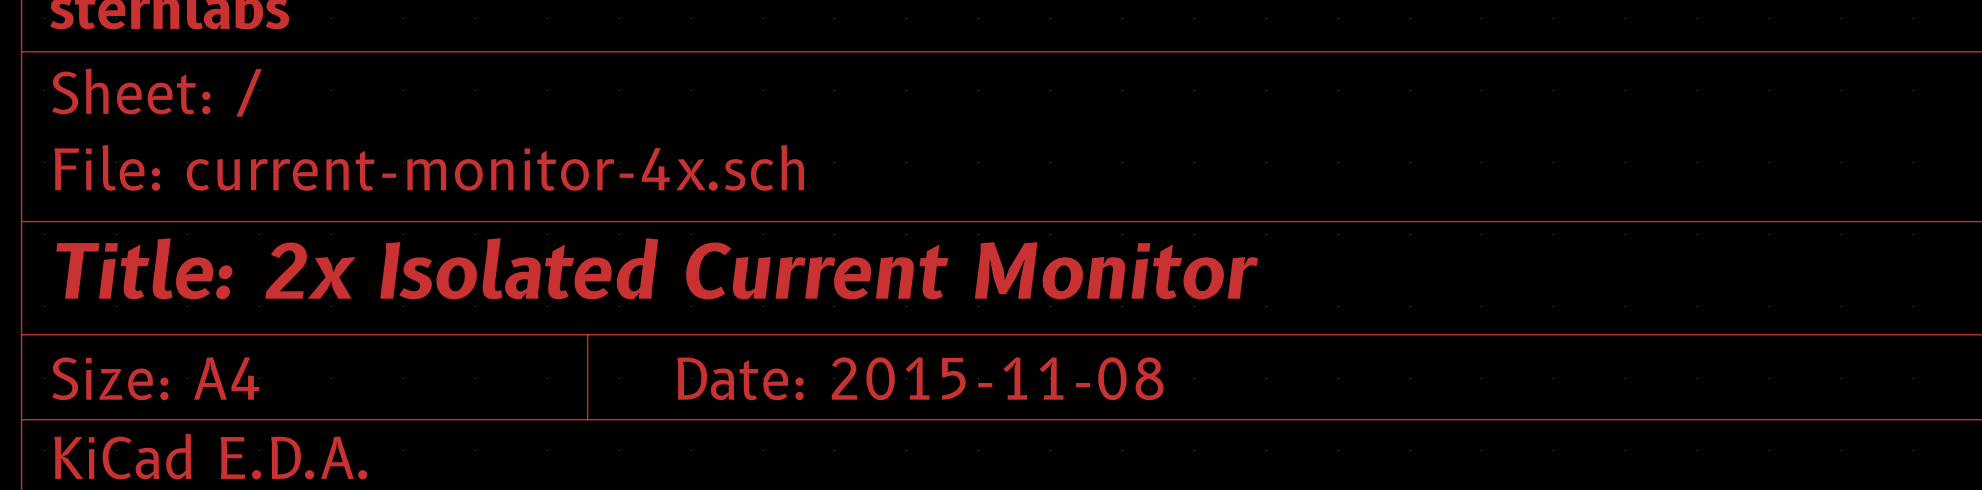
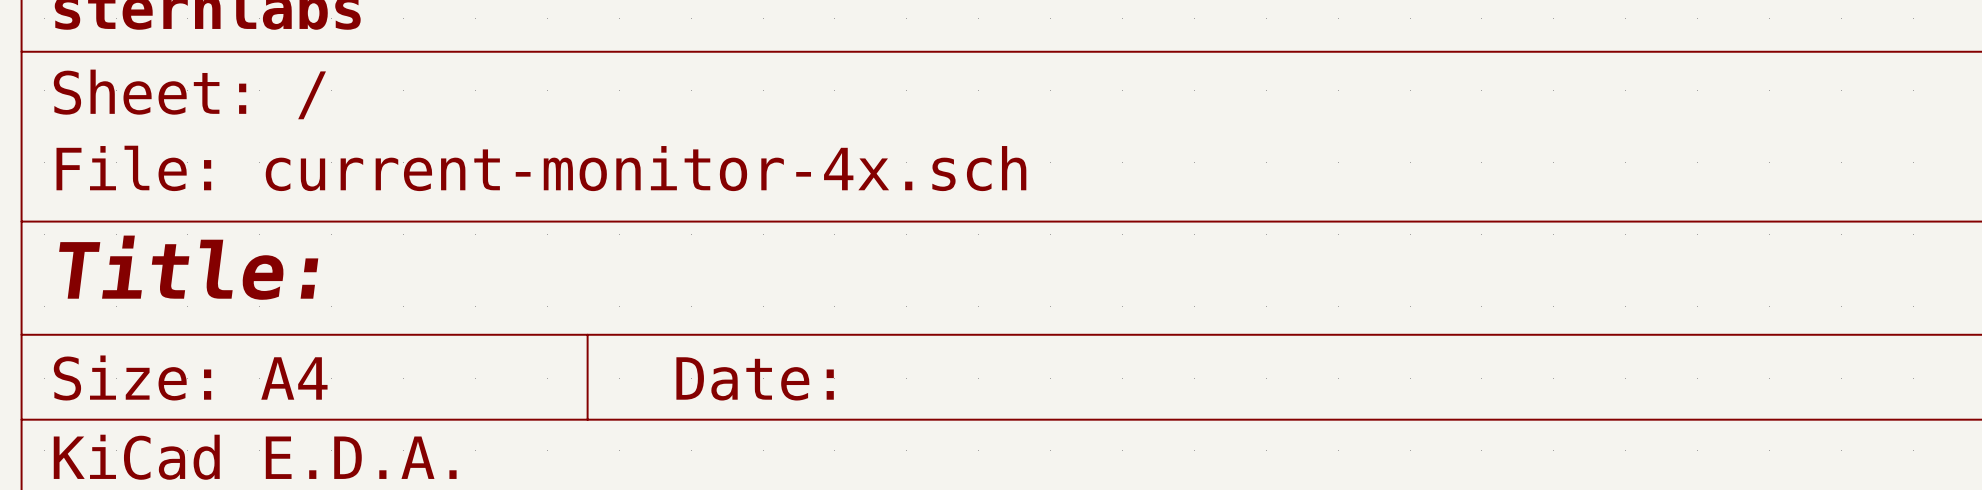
title block: Title: 2x Isolated Current Monitor (657, 268) -> Title: (188, 267)
title block: Date: 2015-11-08 (920, 378) -> Date: (755, 378)

